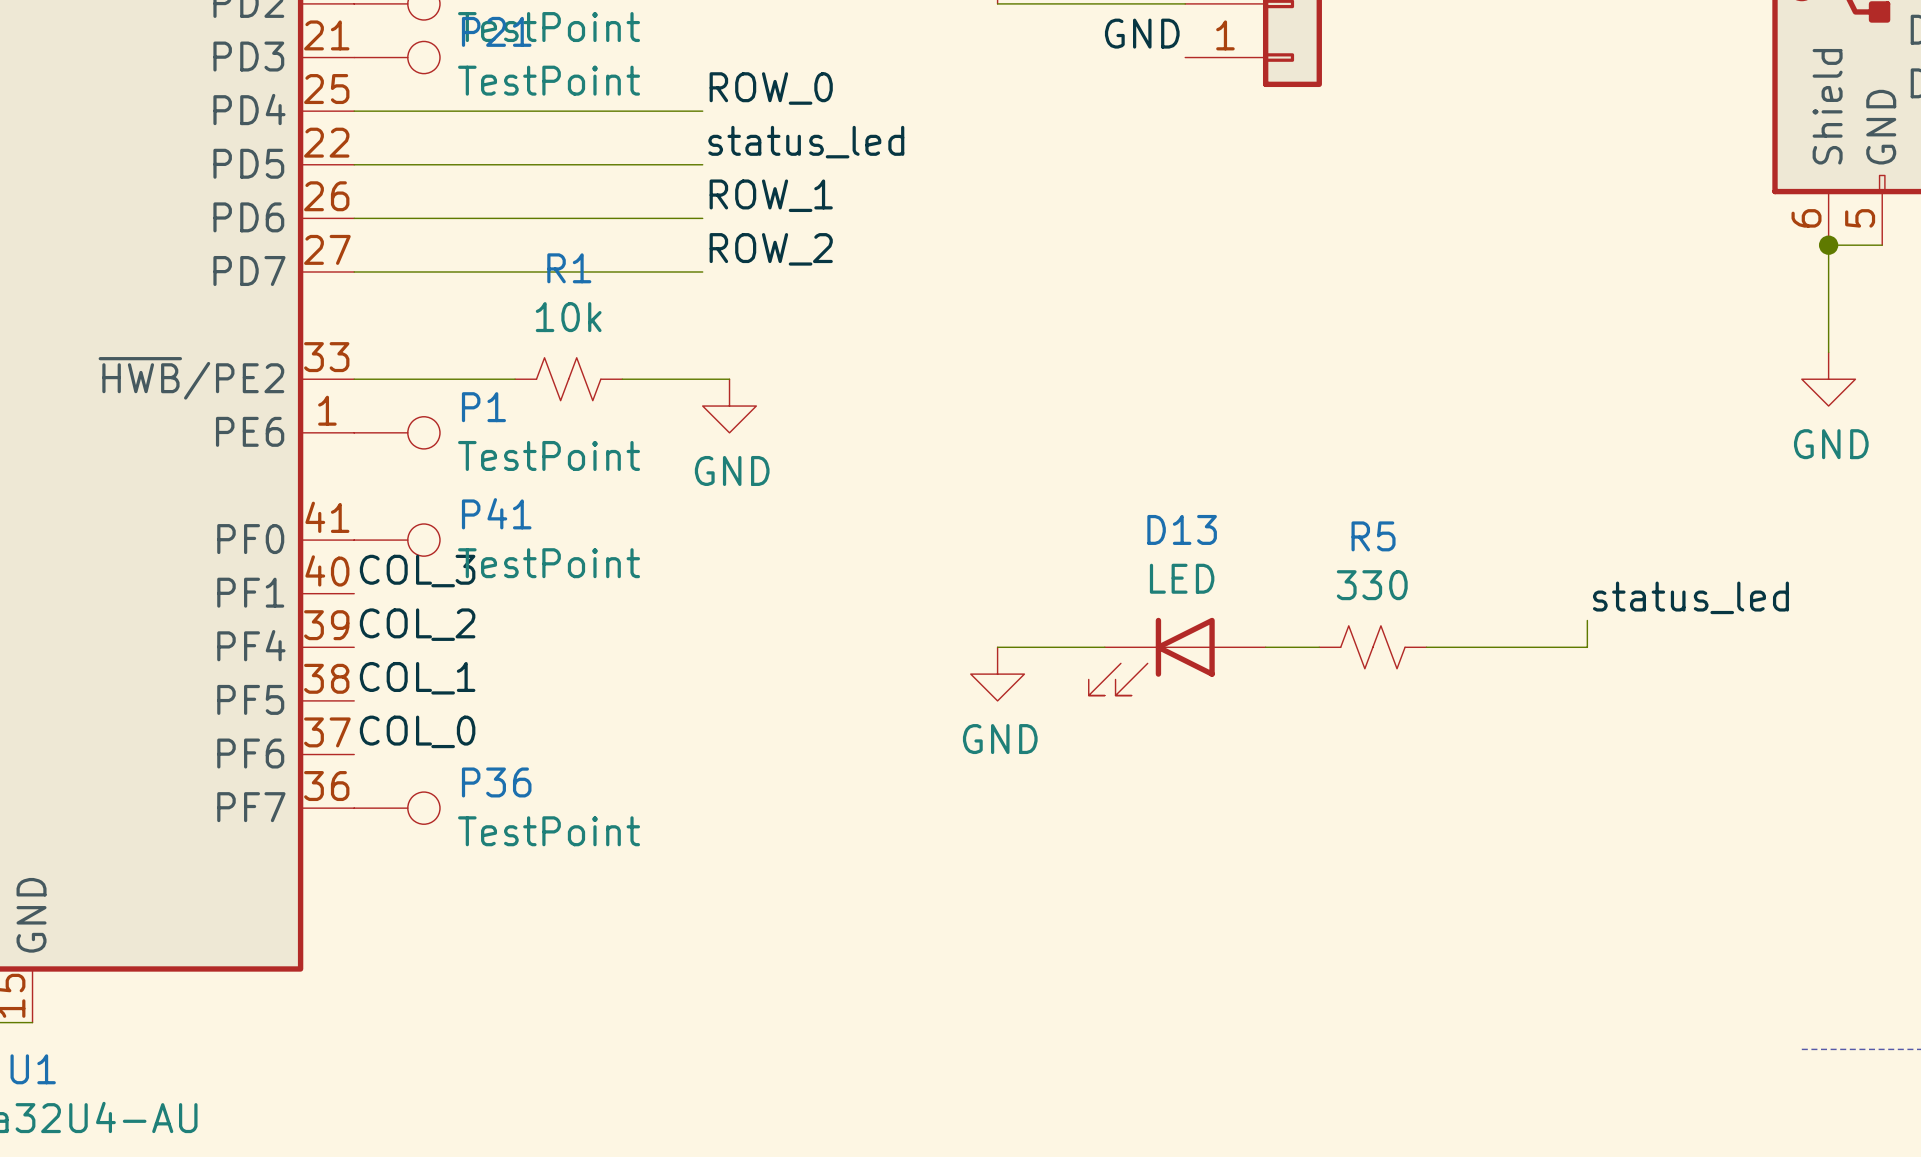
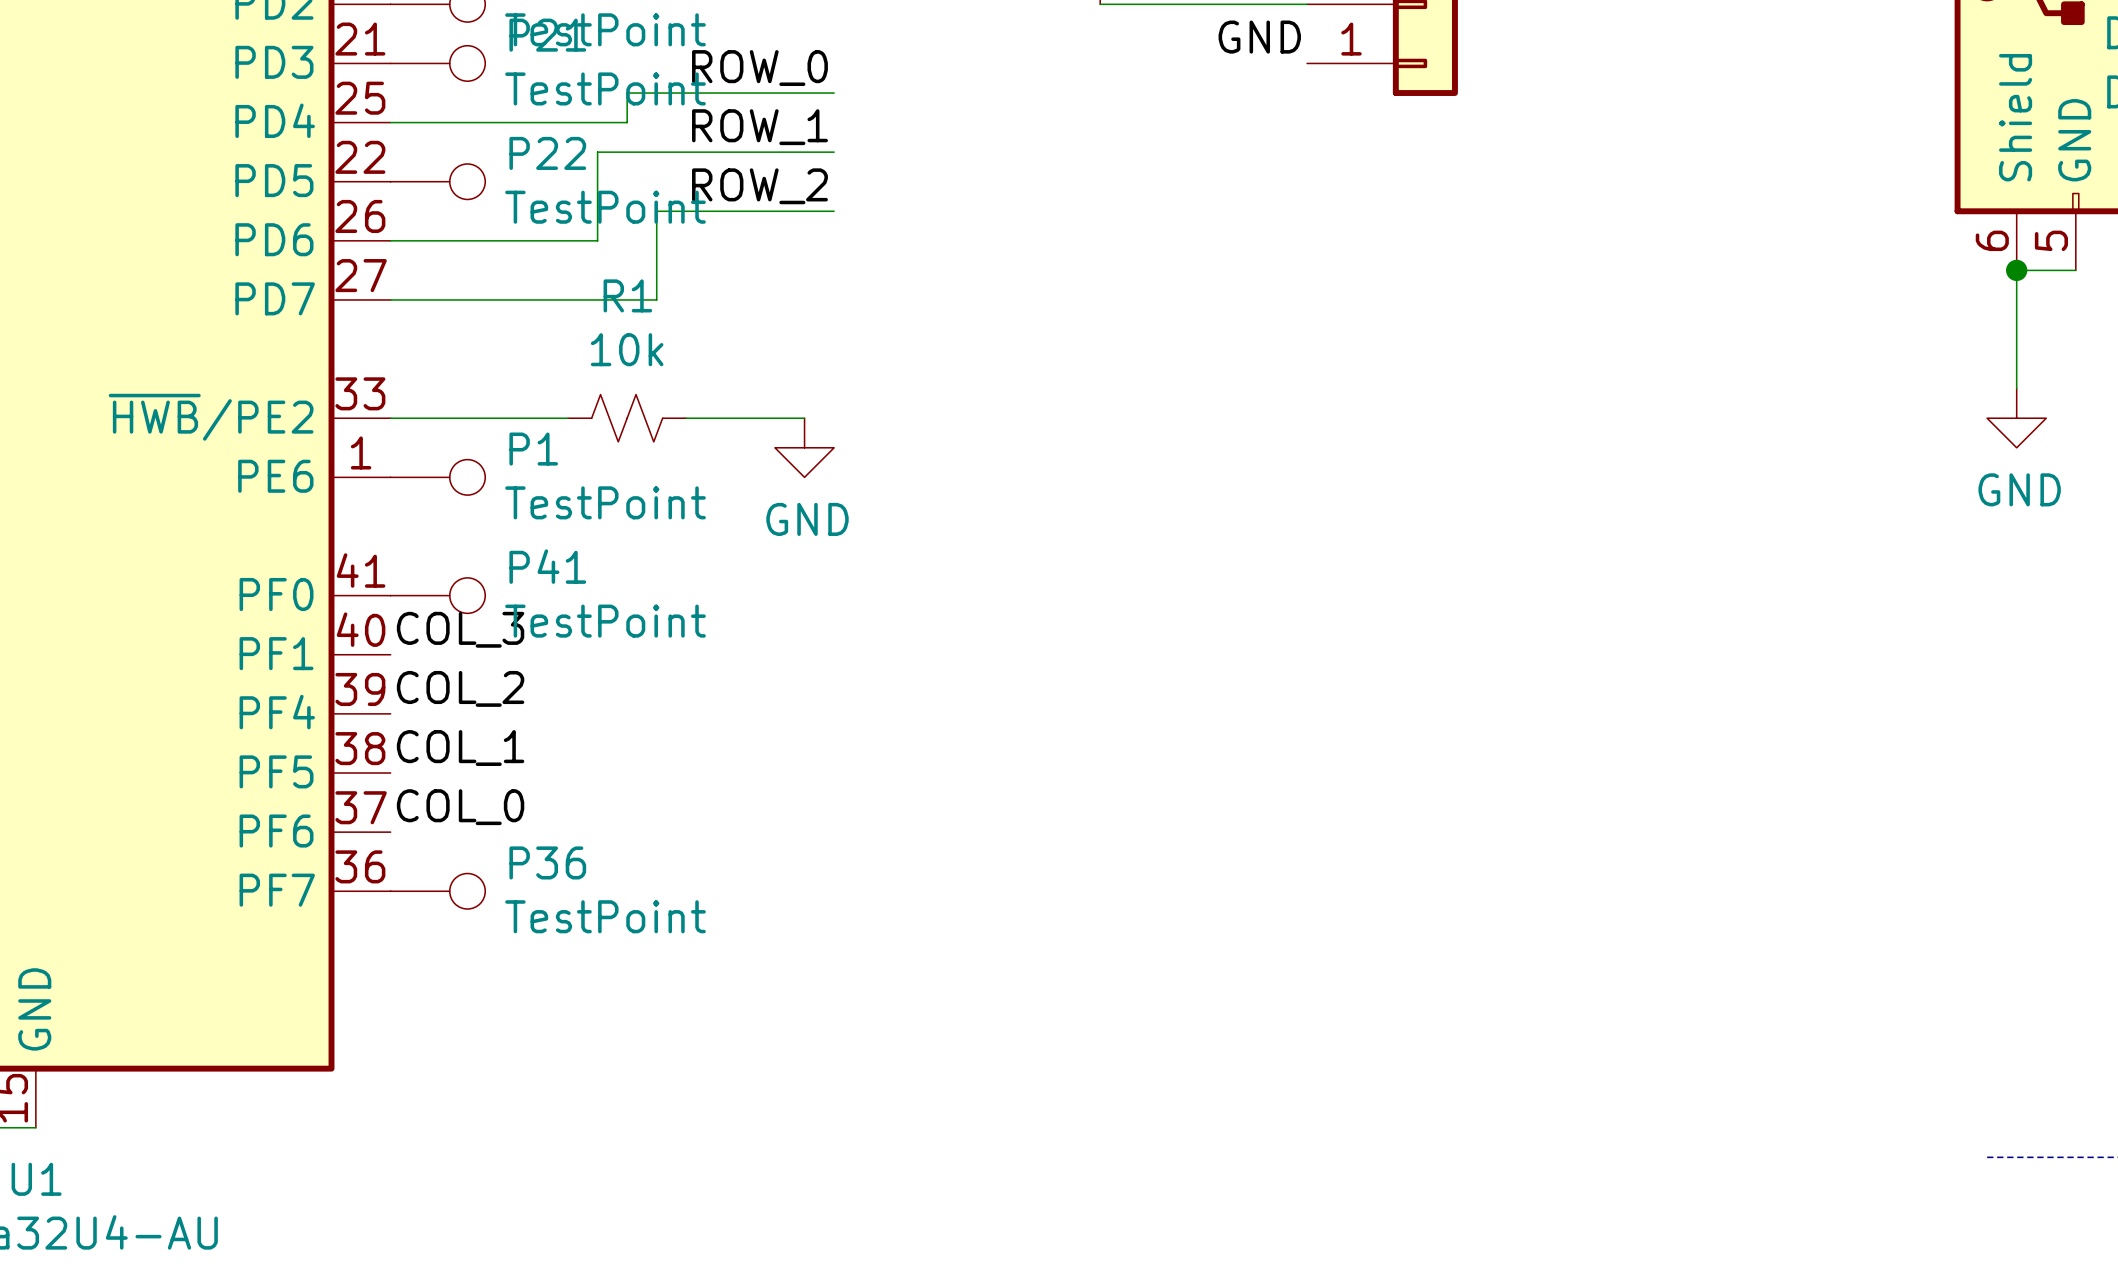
label position: ROW_0 (771, 88) -> ROW_0 (759, 68)
wire: (568, 111) (702, 111) -> (627, 122) (627, 93) (834, 93)
label: status_led (806, 142) -> none
wire: (354, 164) (702, 164) -> none
P22: none -> TestPoint (437, 181)
label position: ROW_1 (771, 195) -> ROW_1 (759, 127)
wire: (541, 218) (702, 218) -> (597, 240) (597, 152) (834, 152)
label position: ROW_2 (771, 249) -> ROW_2 (759, 186)
wire: (595, 271) (702, 271) -> (656, 299) (656, 211) (834, 211)
label: status_led (1690, 597) -> none
wire: (1587, 620) (1587, 647) (1426, 647) -> none
wire: (997, 647) (1104, 647) -> none
wire: (1265, 647) (1319, 647) -> none
R5: 330 (1372, 647) -> none
D13: LED (1177, 656) -> none
power symbol: GND (997, 674) -> none

